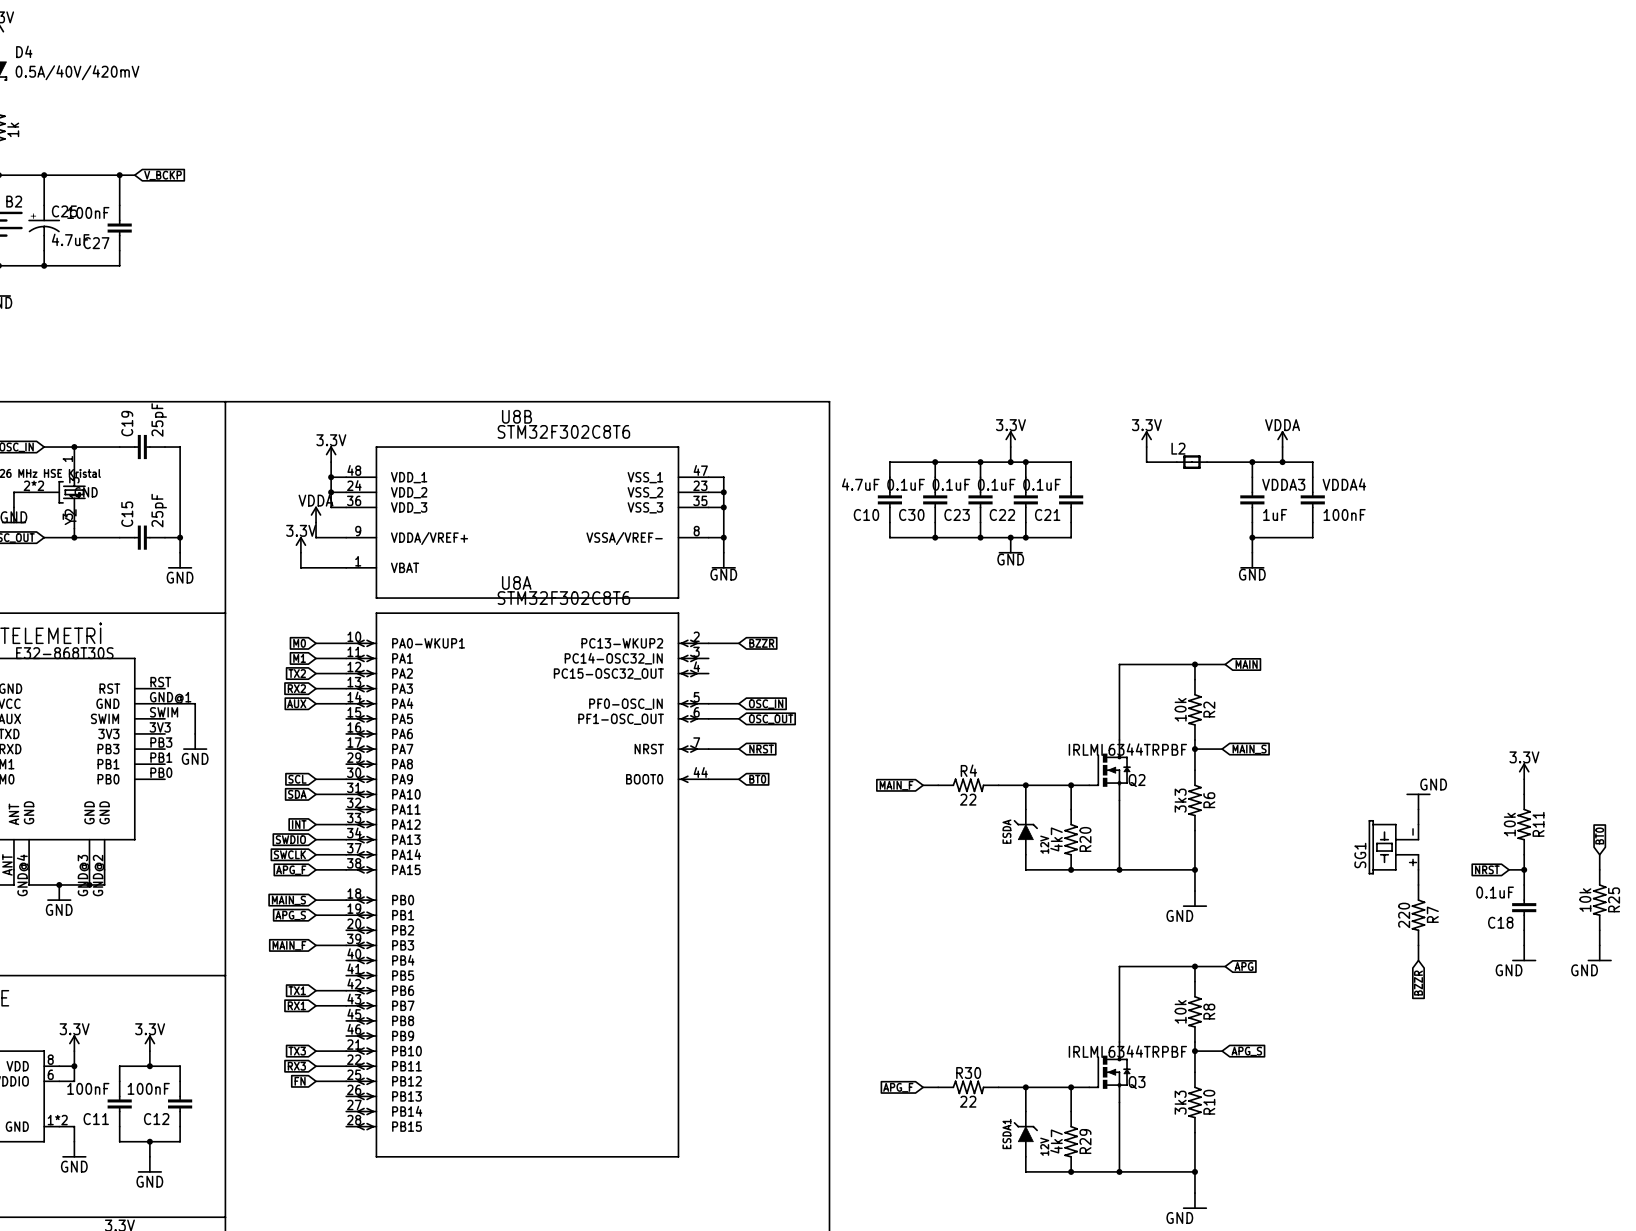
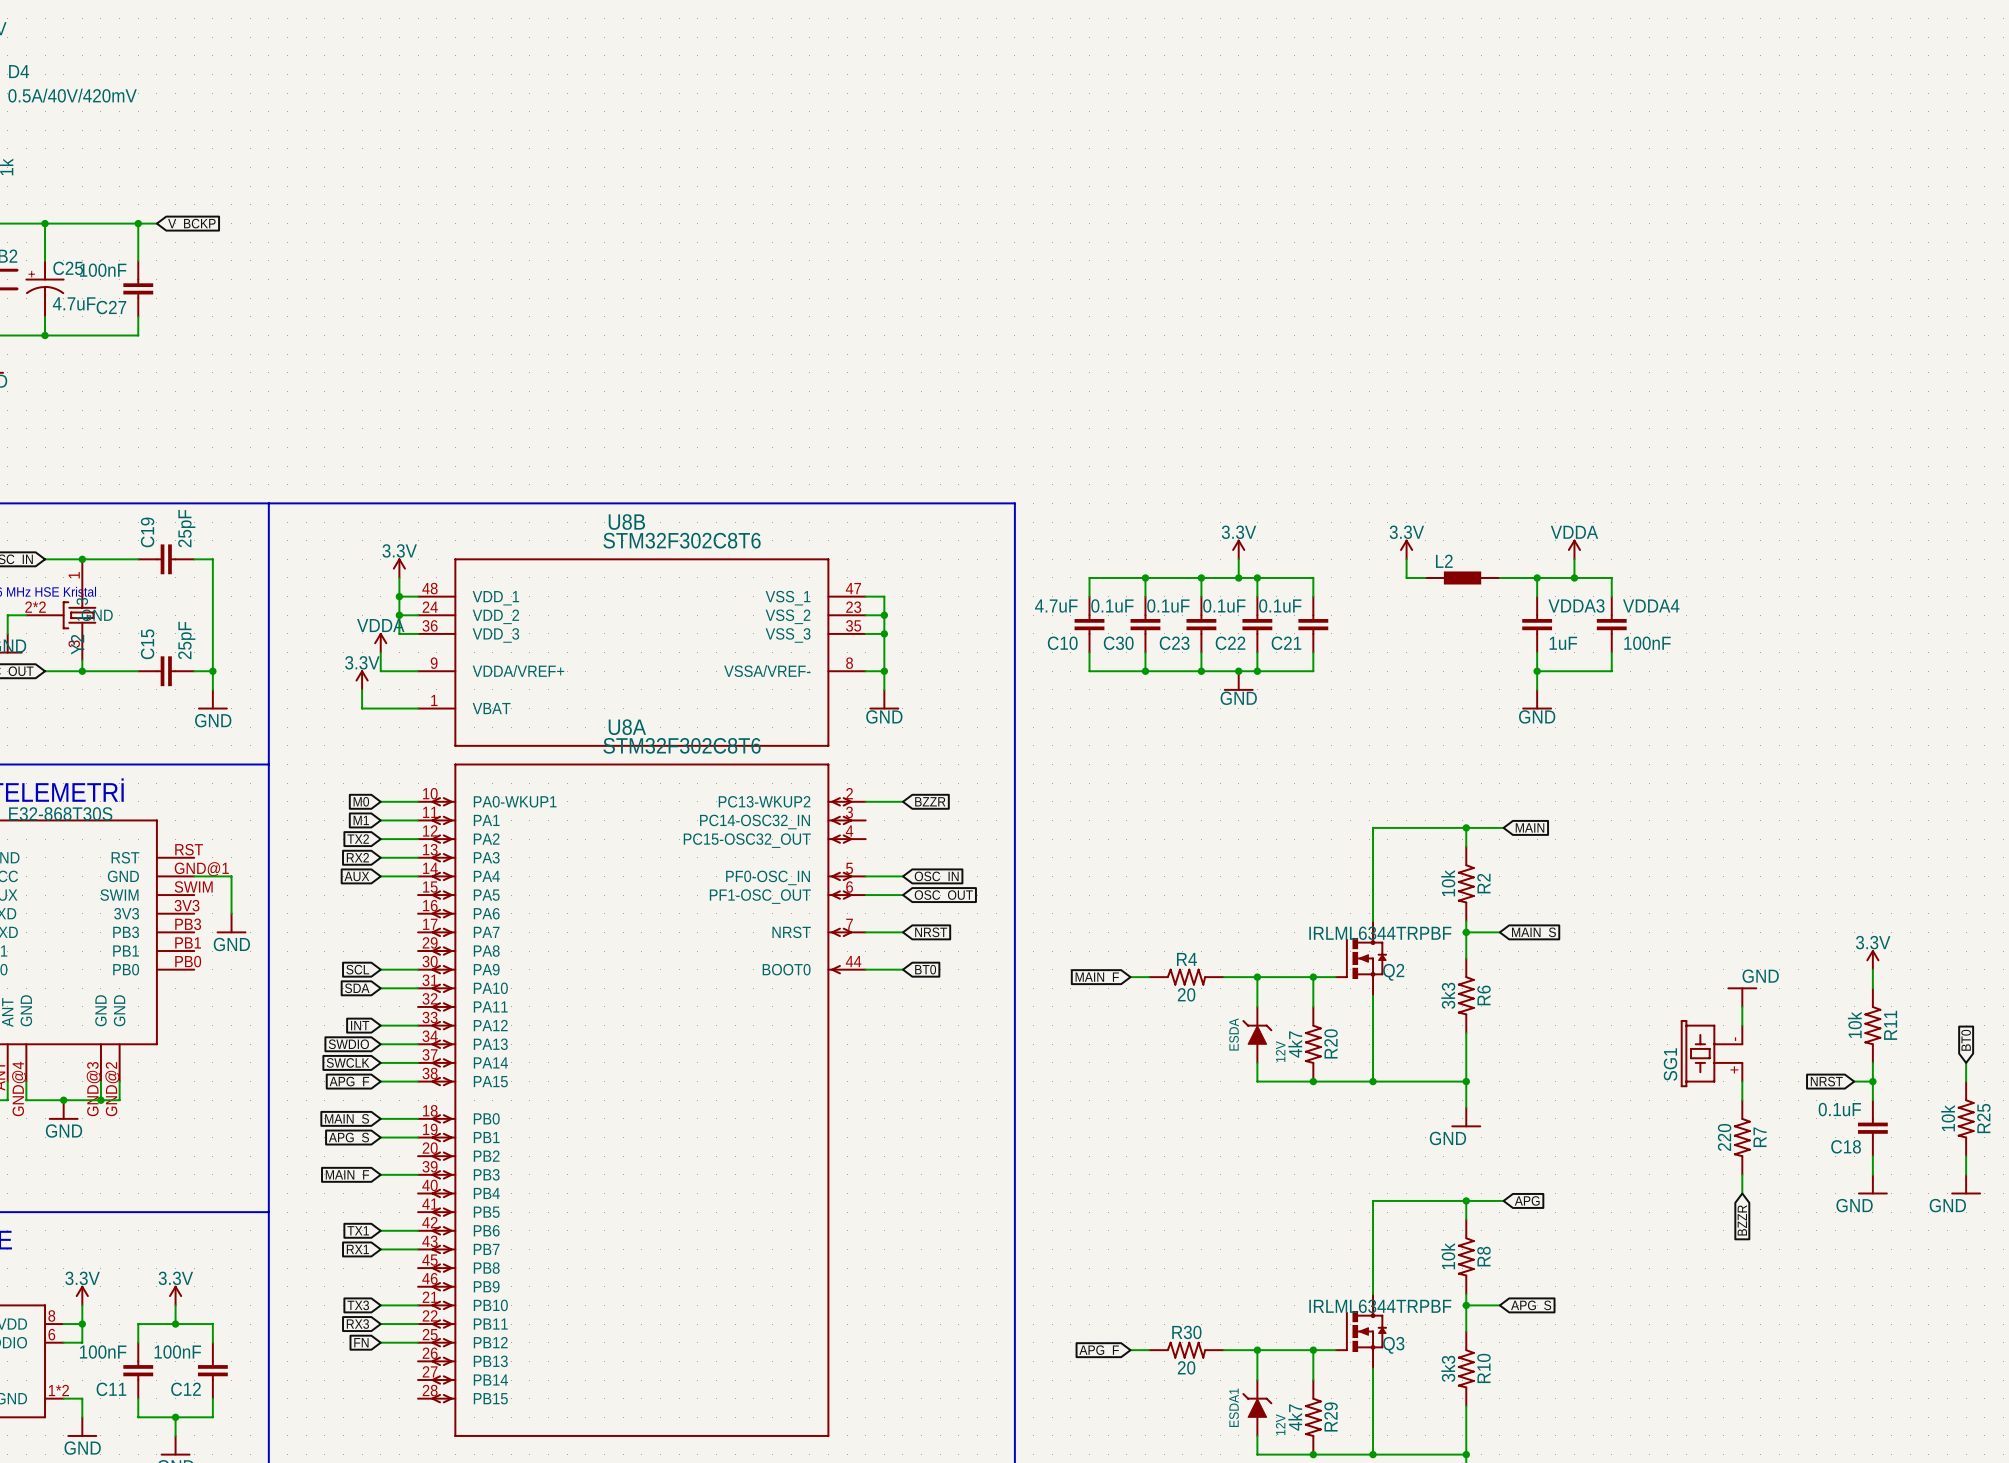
L2 symbol: [1176, 455, 1208, 469] -> [1425, 571, 1500, 585]
R4 value: 22 (968, 799) -> 20 (1186, 994)
R30 value: 22 (968, 1101) -> 20 (1186, 1367)

